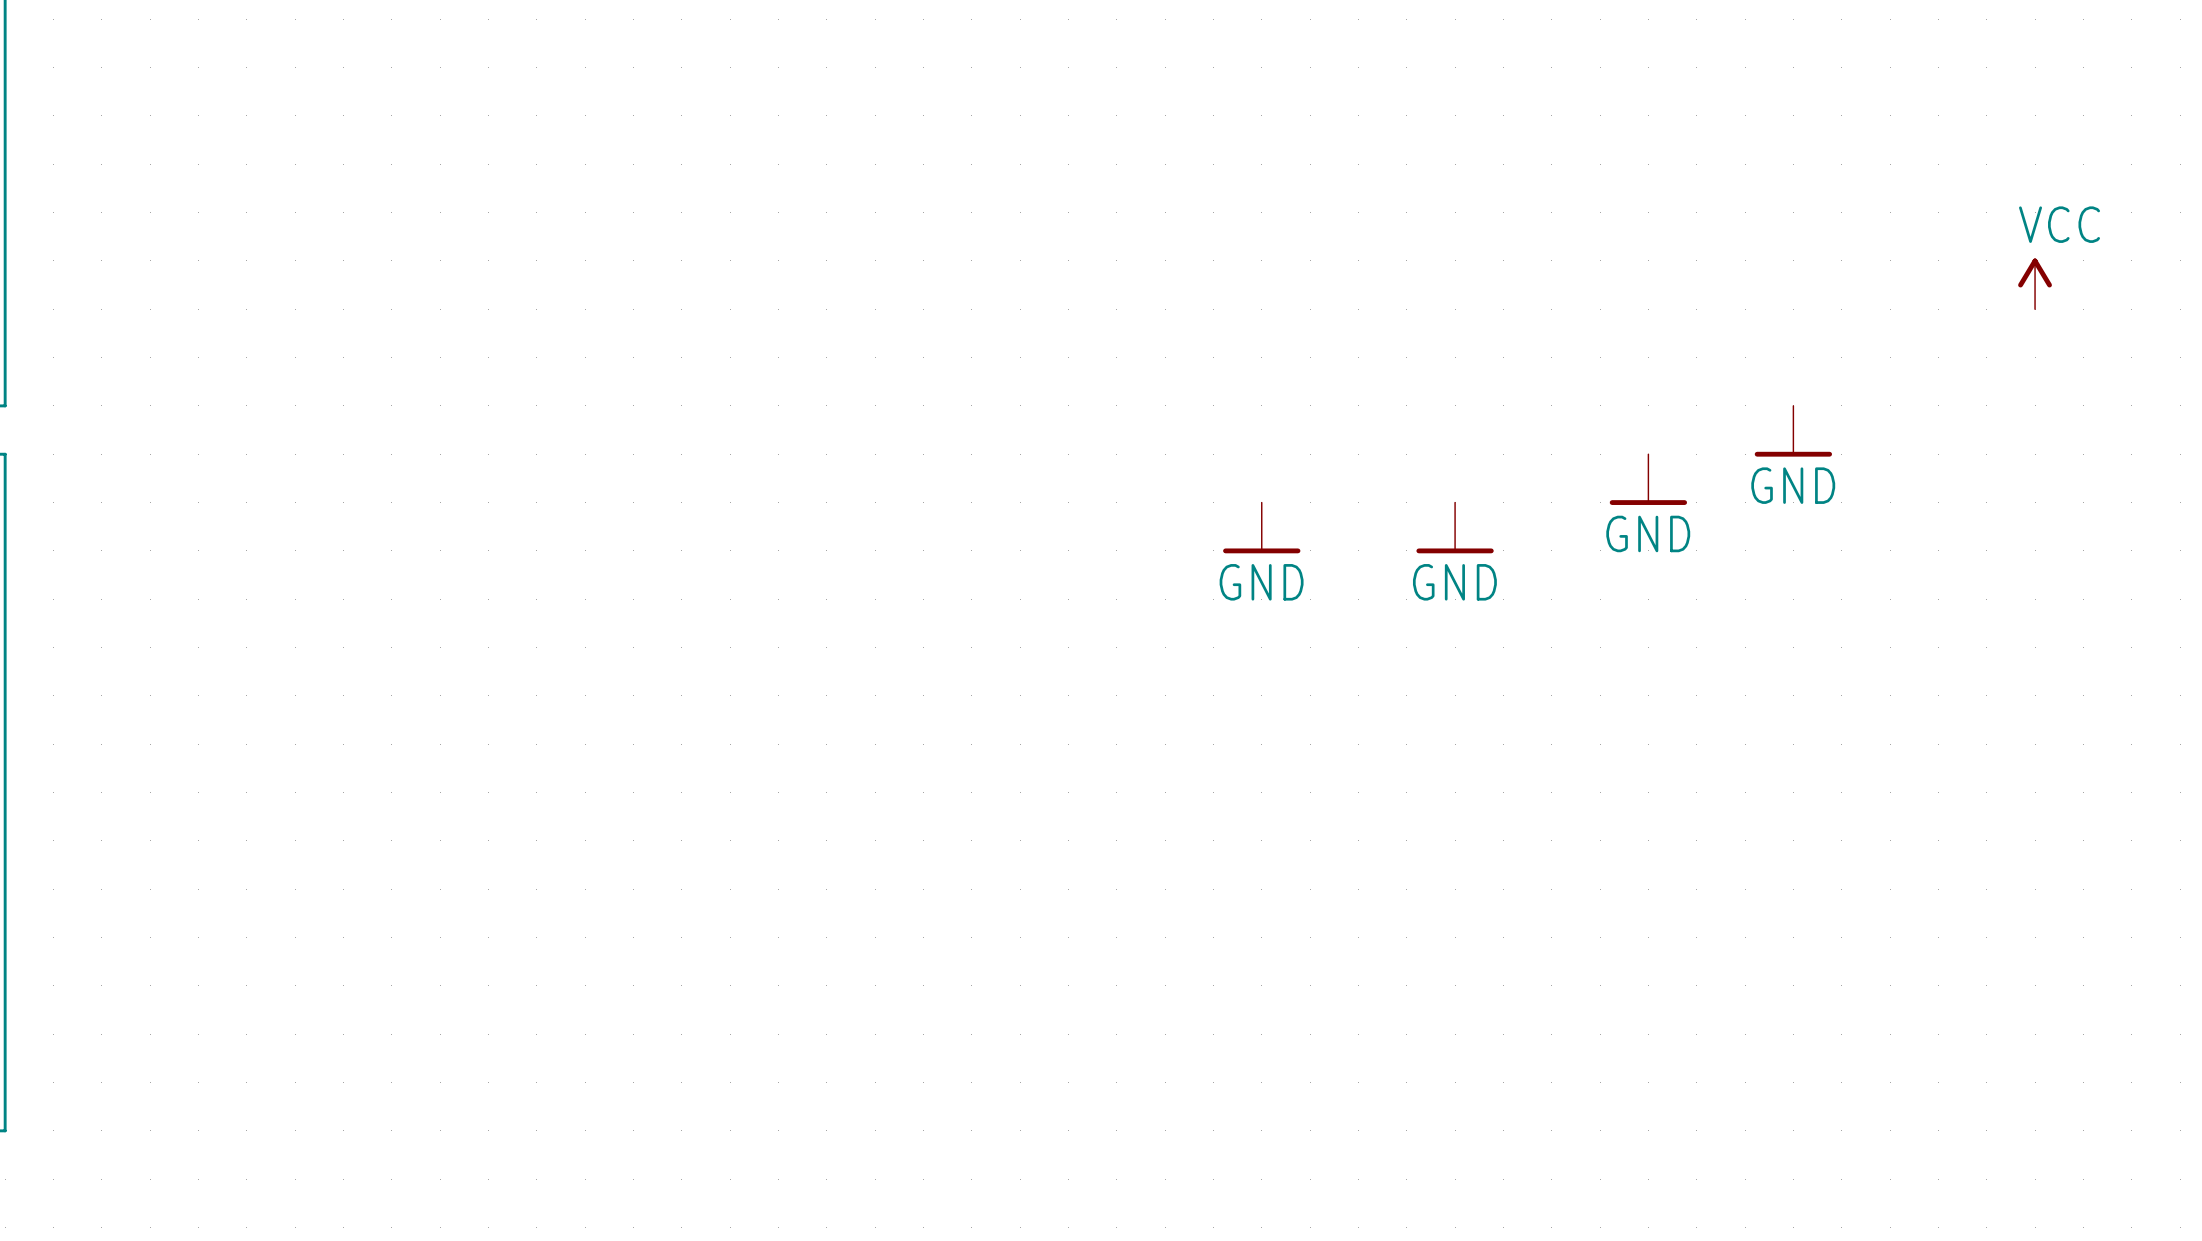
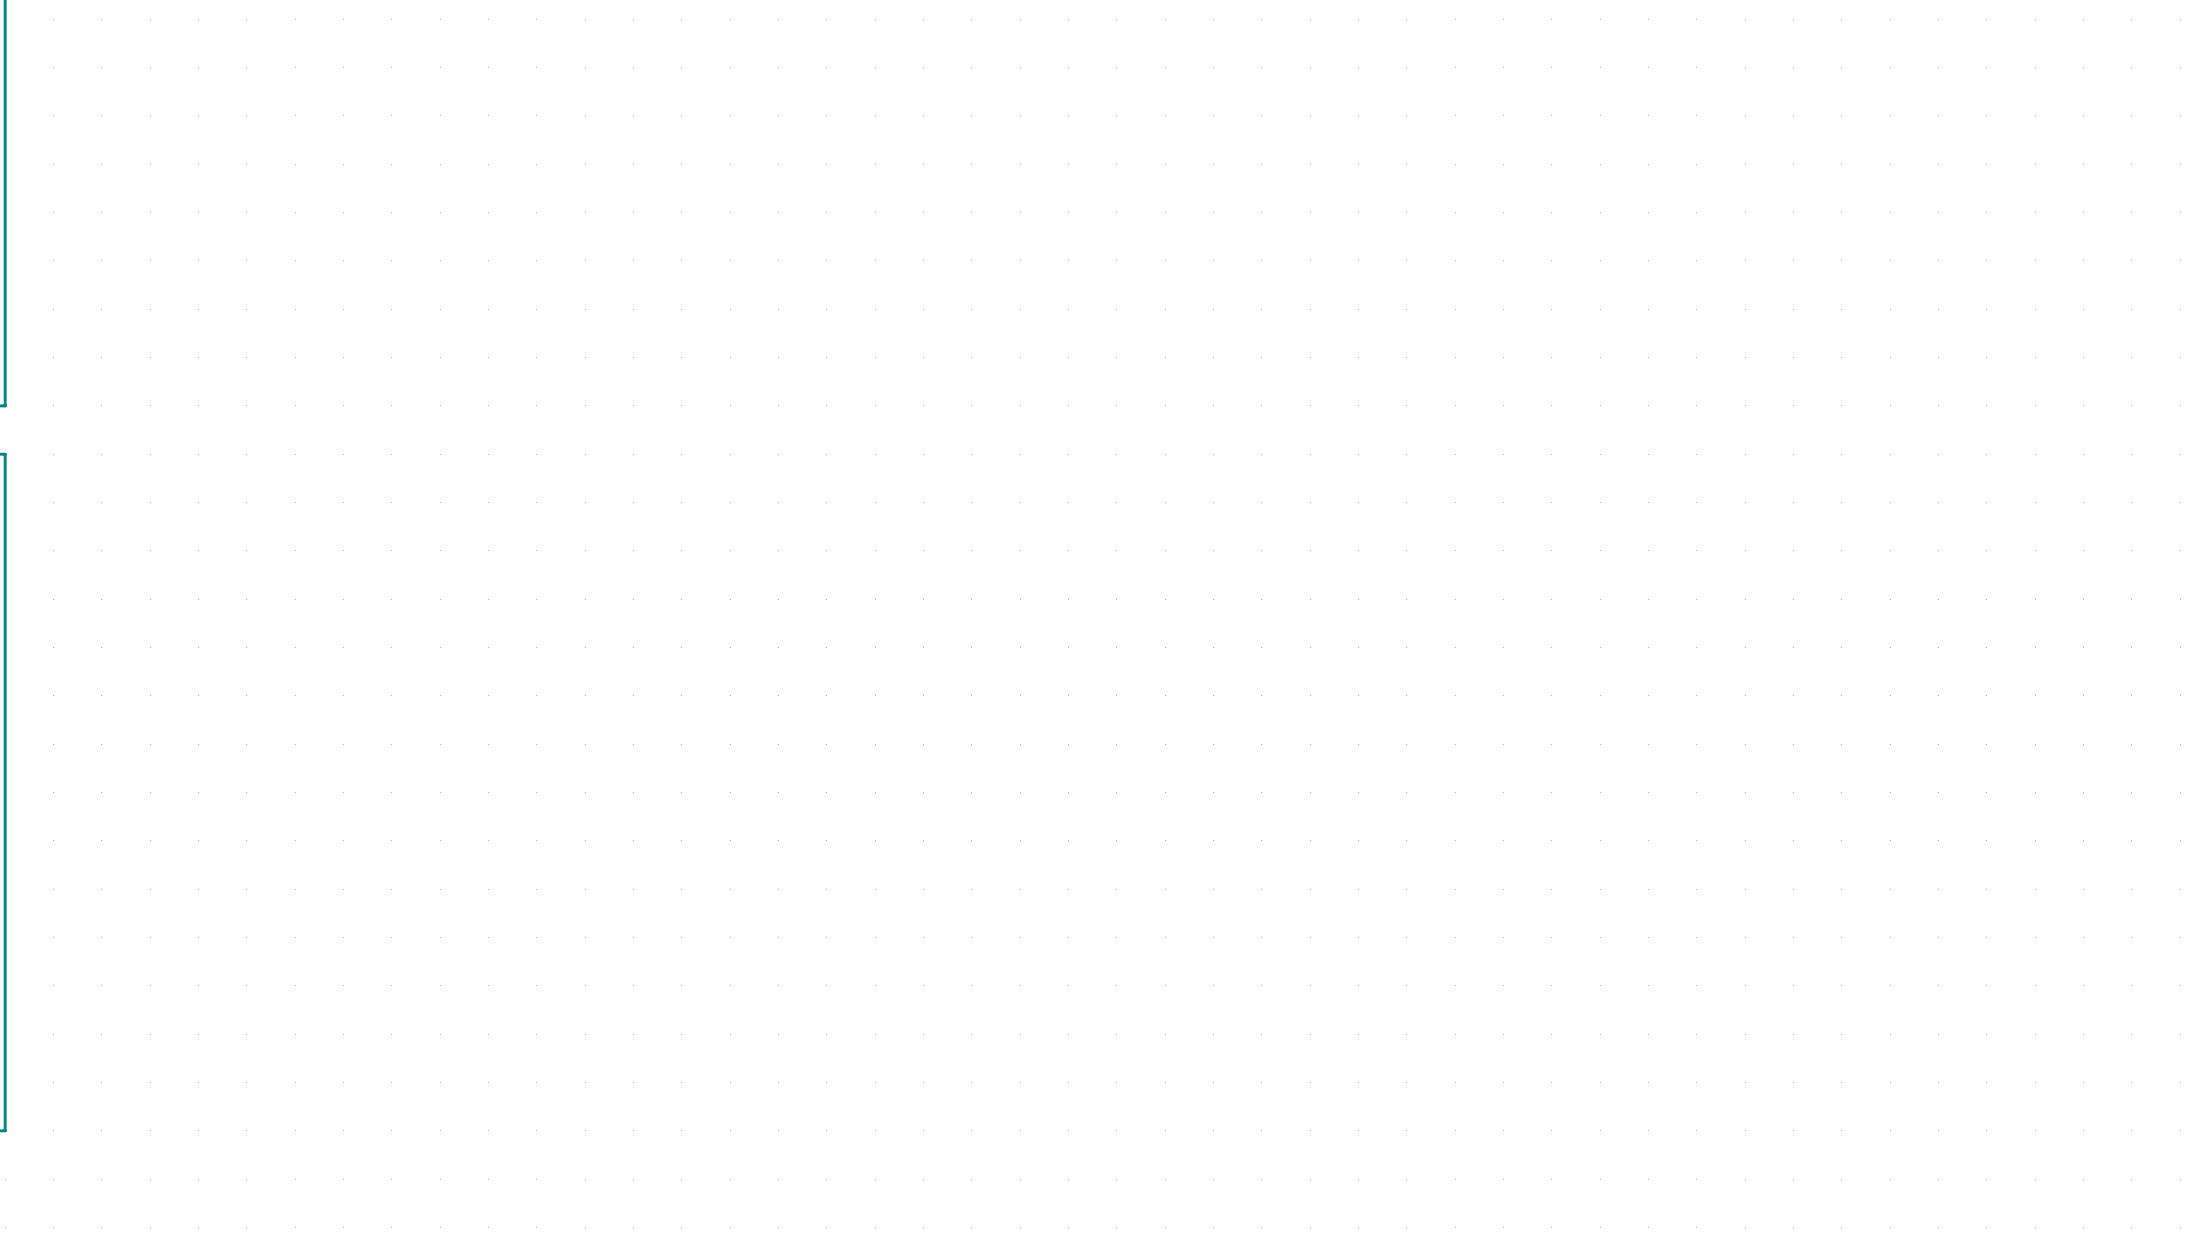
power symbol: VCC (2035, 283) -> none
power symbol: GND (1793, 431) -> none
power symbol: GND (1648, 479) -> none
power symbol: GND (1261, 527) -> none
power symbol: GND (1455, 527) -> none

